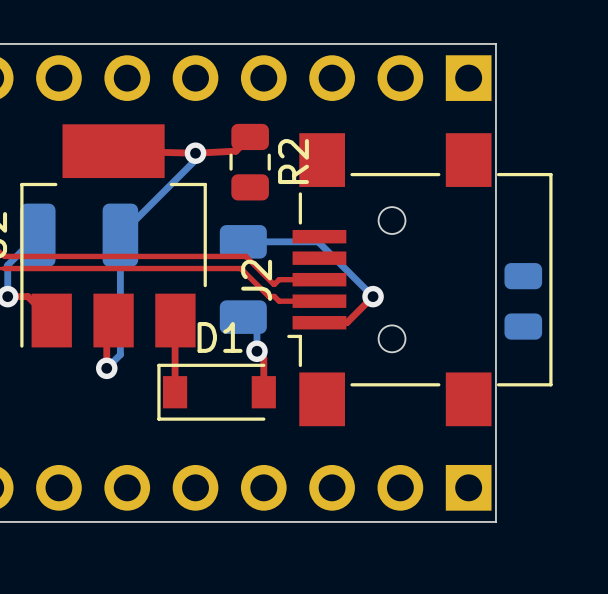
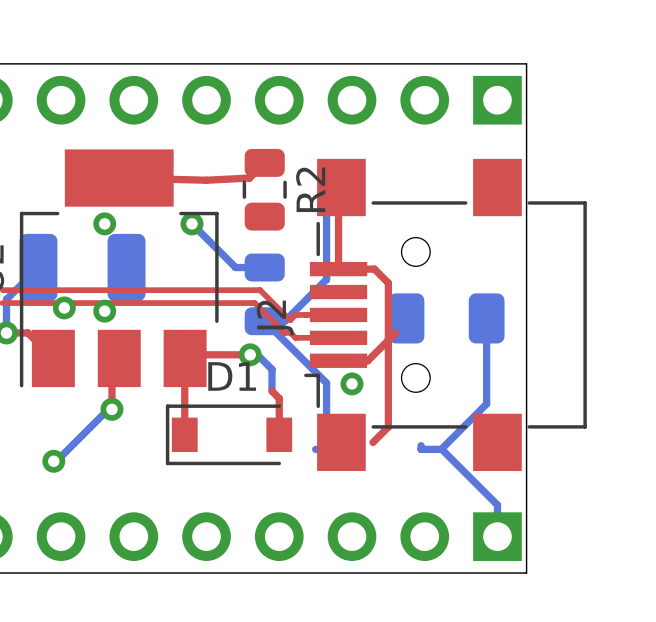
bottom track: (195, 153) (195, 160) (120, 235) (120, 354) (106, 368) -> none
via position: (195, 153) -> (191, 223)
bottom track: none -> (326, 187) (326, 279) (284, 321) (264, 321) (326, 383) (326, 449) (315, 449)
top track: none -> (341, 187) (338, 190) (338, 269) (374, 269) (388, 283) (388, 427) (373, 442)
via: none -> (104, 223)
bottom track: none -> (191, 223) (235, 267) (264, 267)
part footprint: [219, 225, 267, 334] -> [244, 253, 285, 336]
bottom track: (243, 241) (318, 241) (373, 296) -> none
via: none -> (64, 307)
via: none -> (104, 311)
part: none -> (446, 318)
bottom track: none -> (486, 318) (486, 403) (441, 449)
via: (373, 296) -> none
part: (523, 301) -> none
top track: none -> (250, 354) (199, 354) (196, 358)
via: none -> (250, 354)
via: none -> (352, 383)
via: (256, 351) -> none
bottom track: none -> (111, 405) (56, 461) (53, 461)
bottom track: none -> (421, 445) (421, 449) (441, 449) (497, 505) (497, 536)
via: none -> (53, 461)

